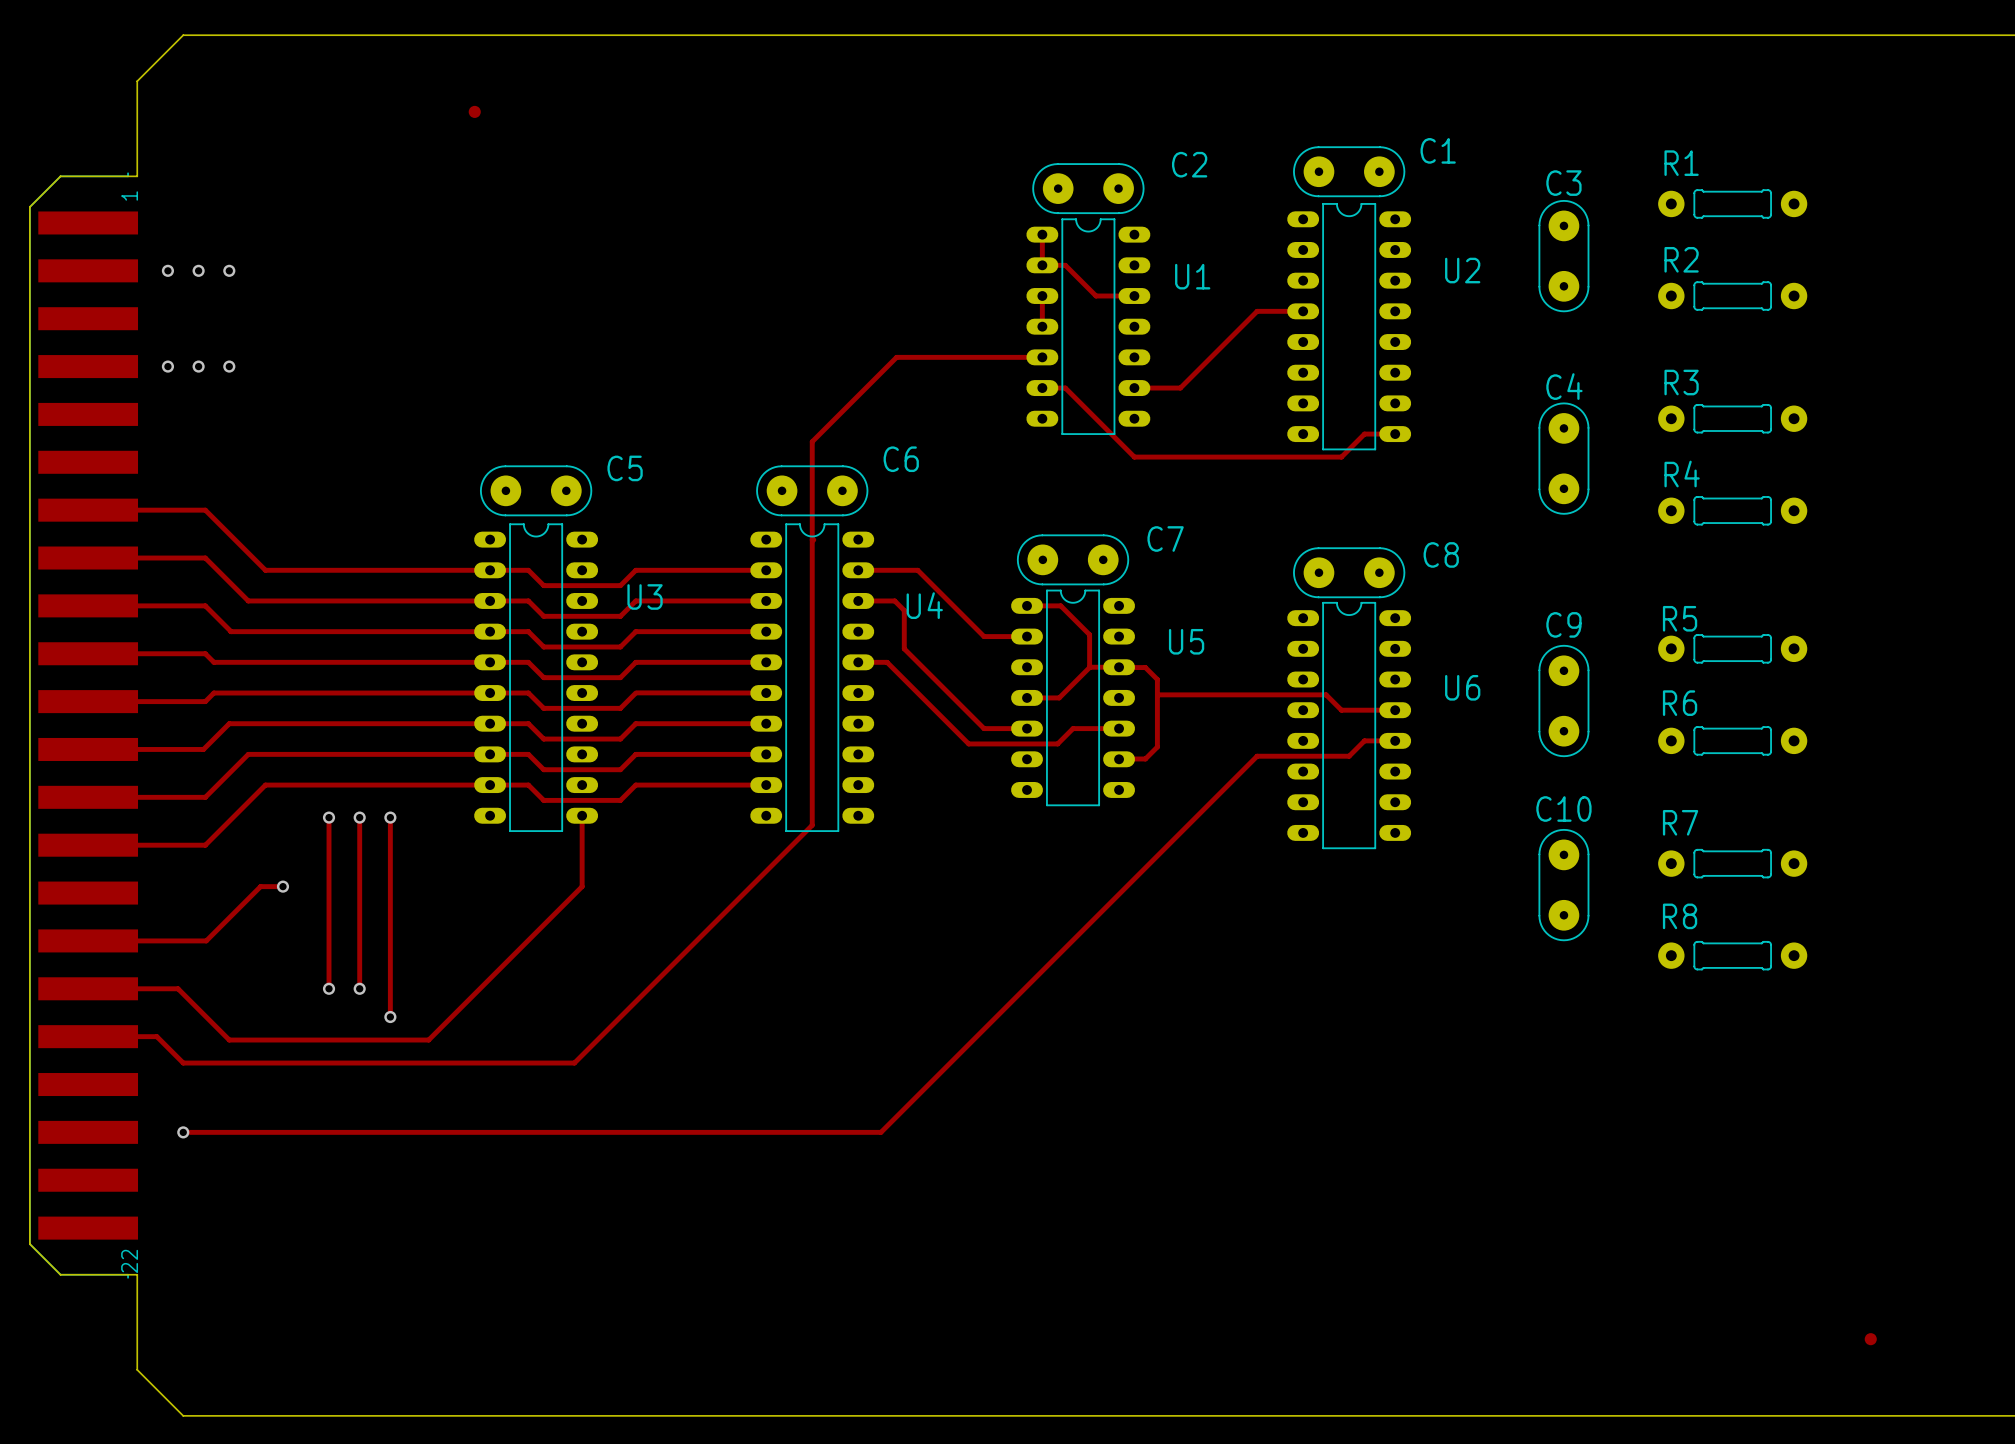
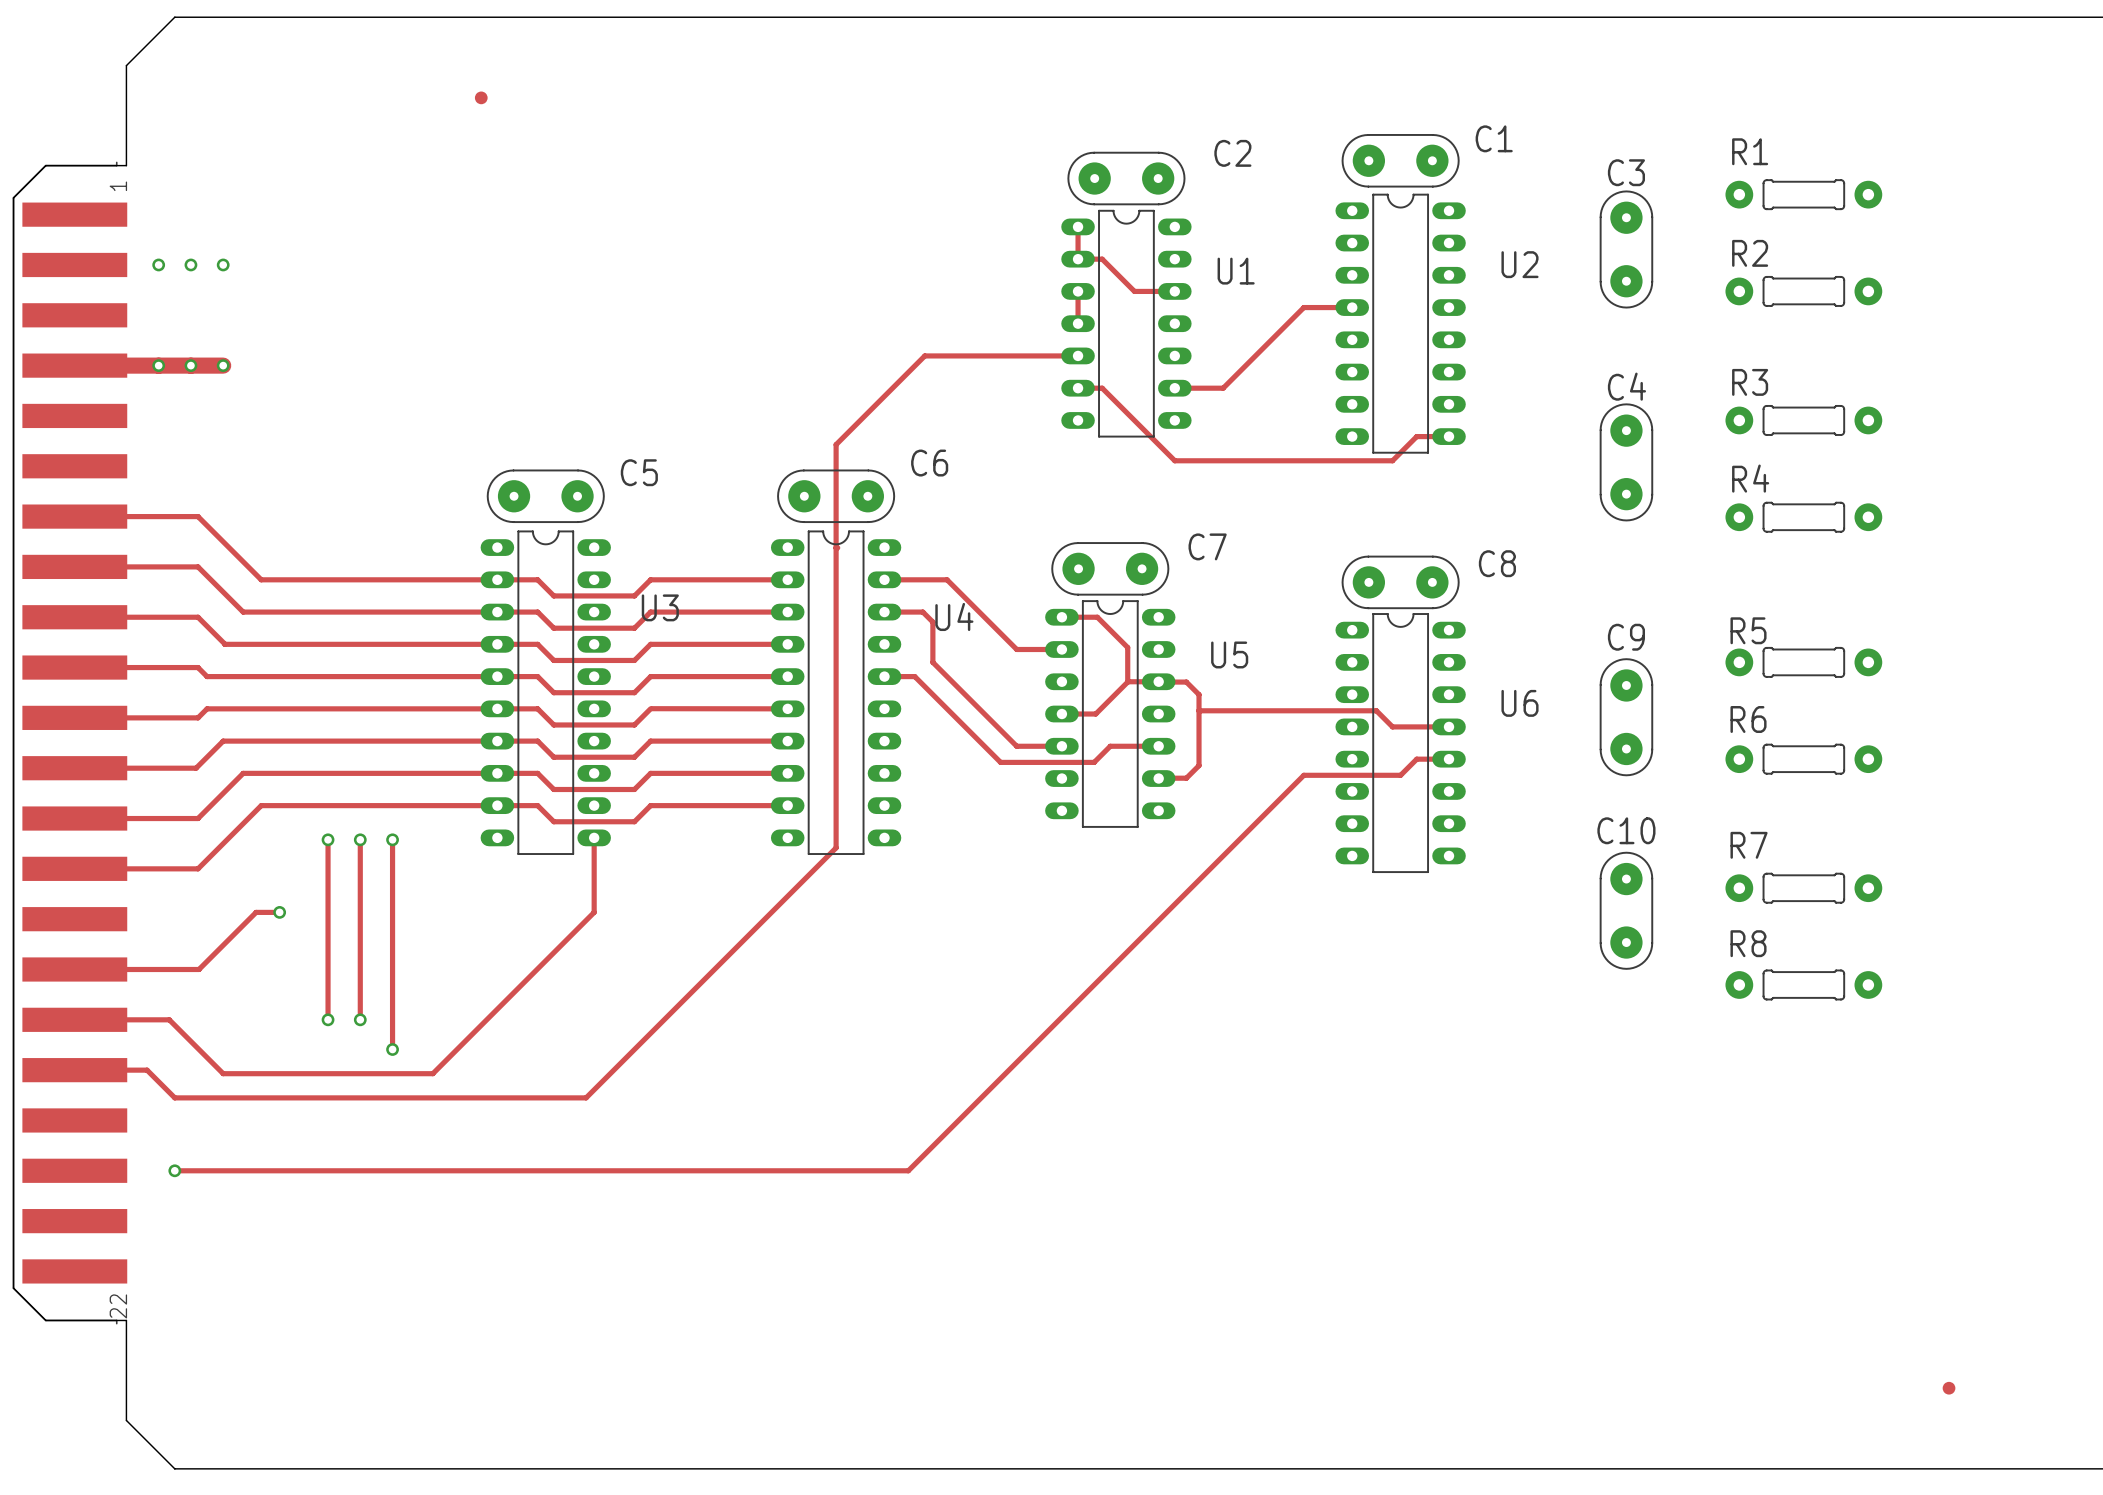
track: none -> (74, 365) (223, 365)

